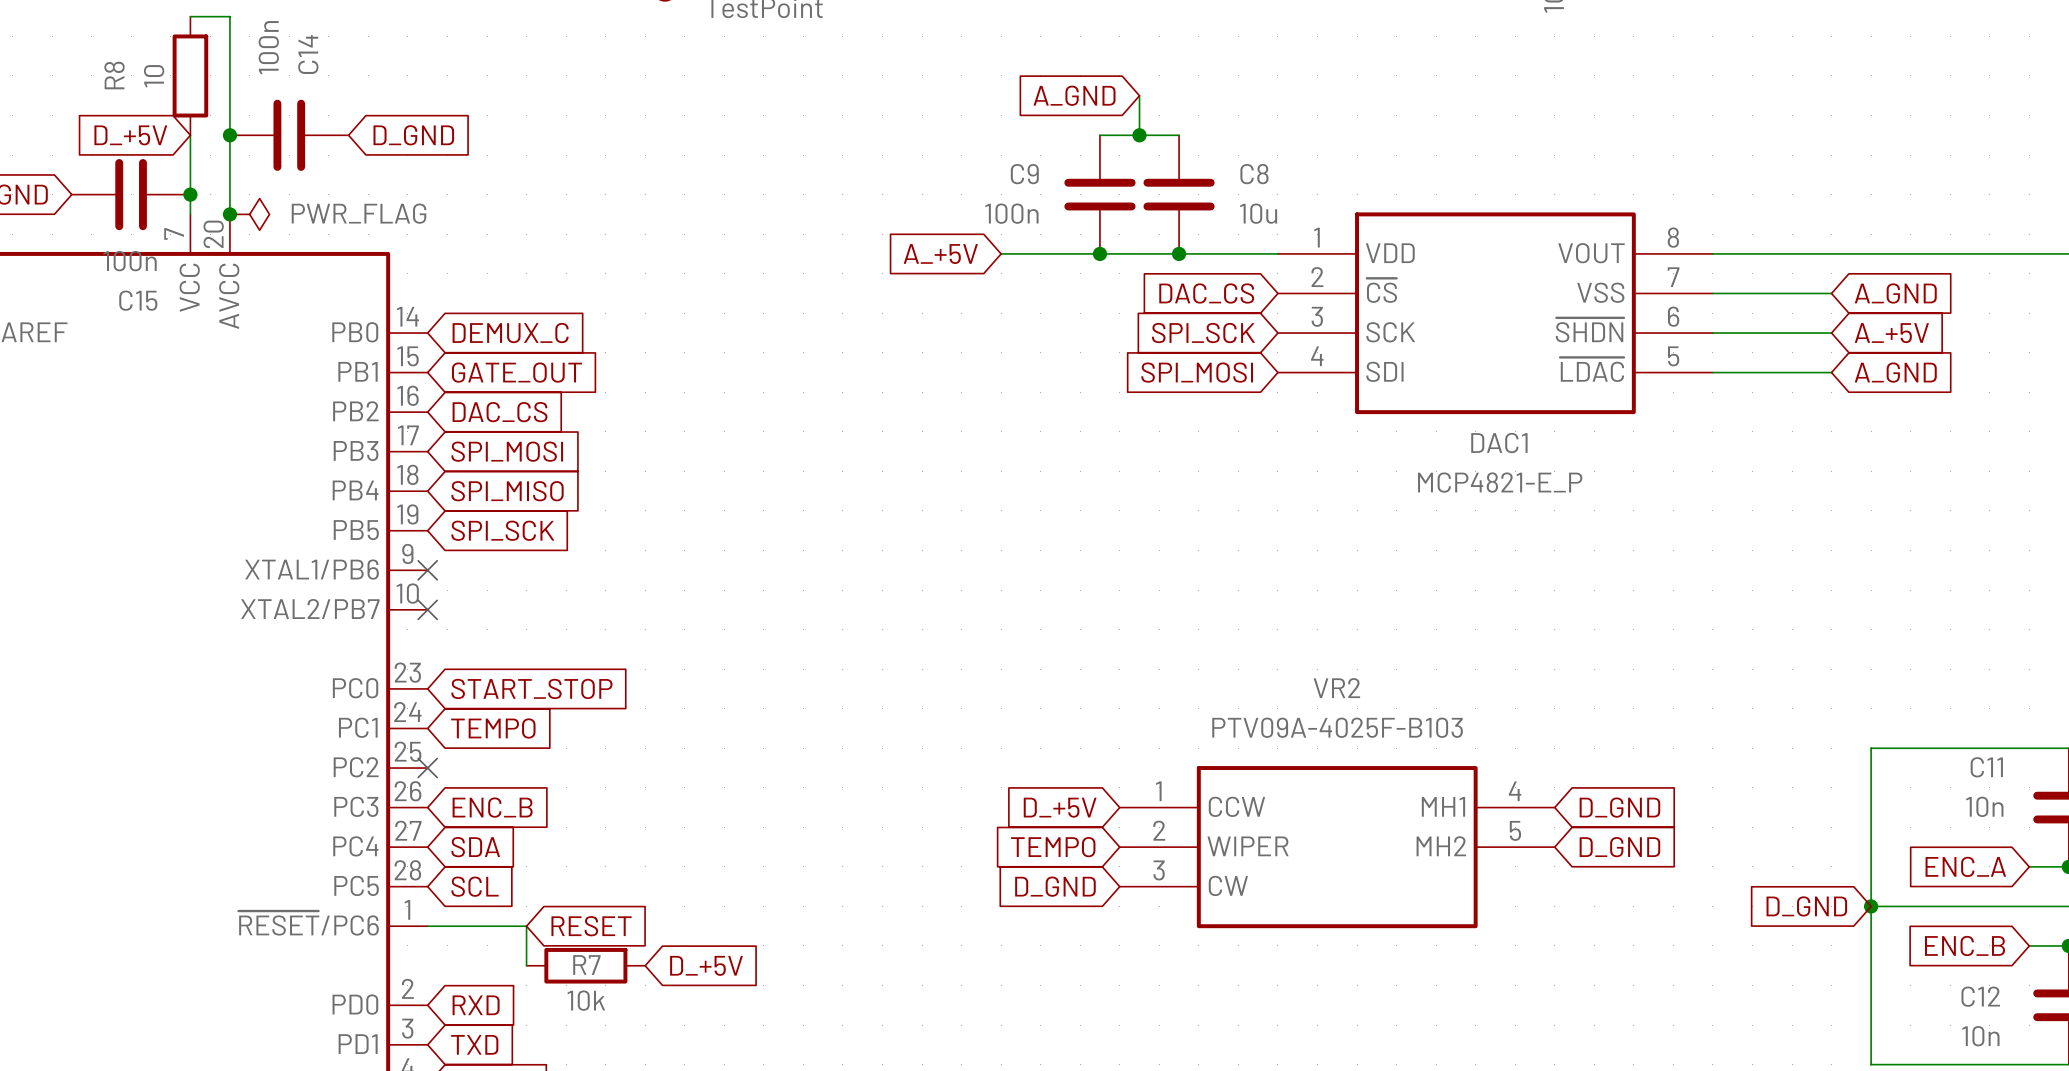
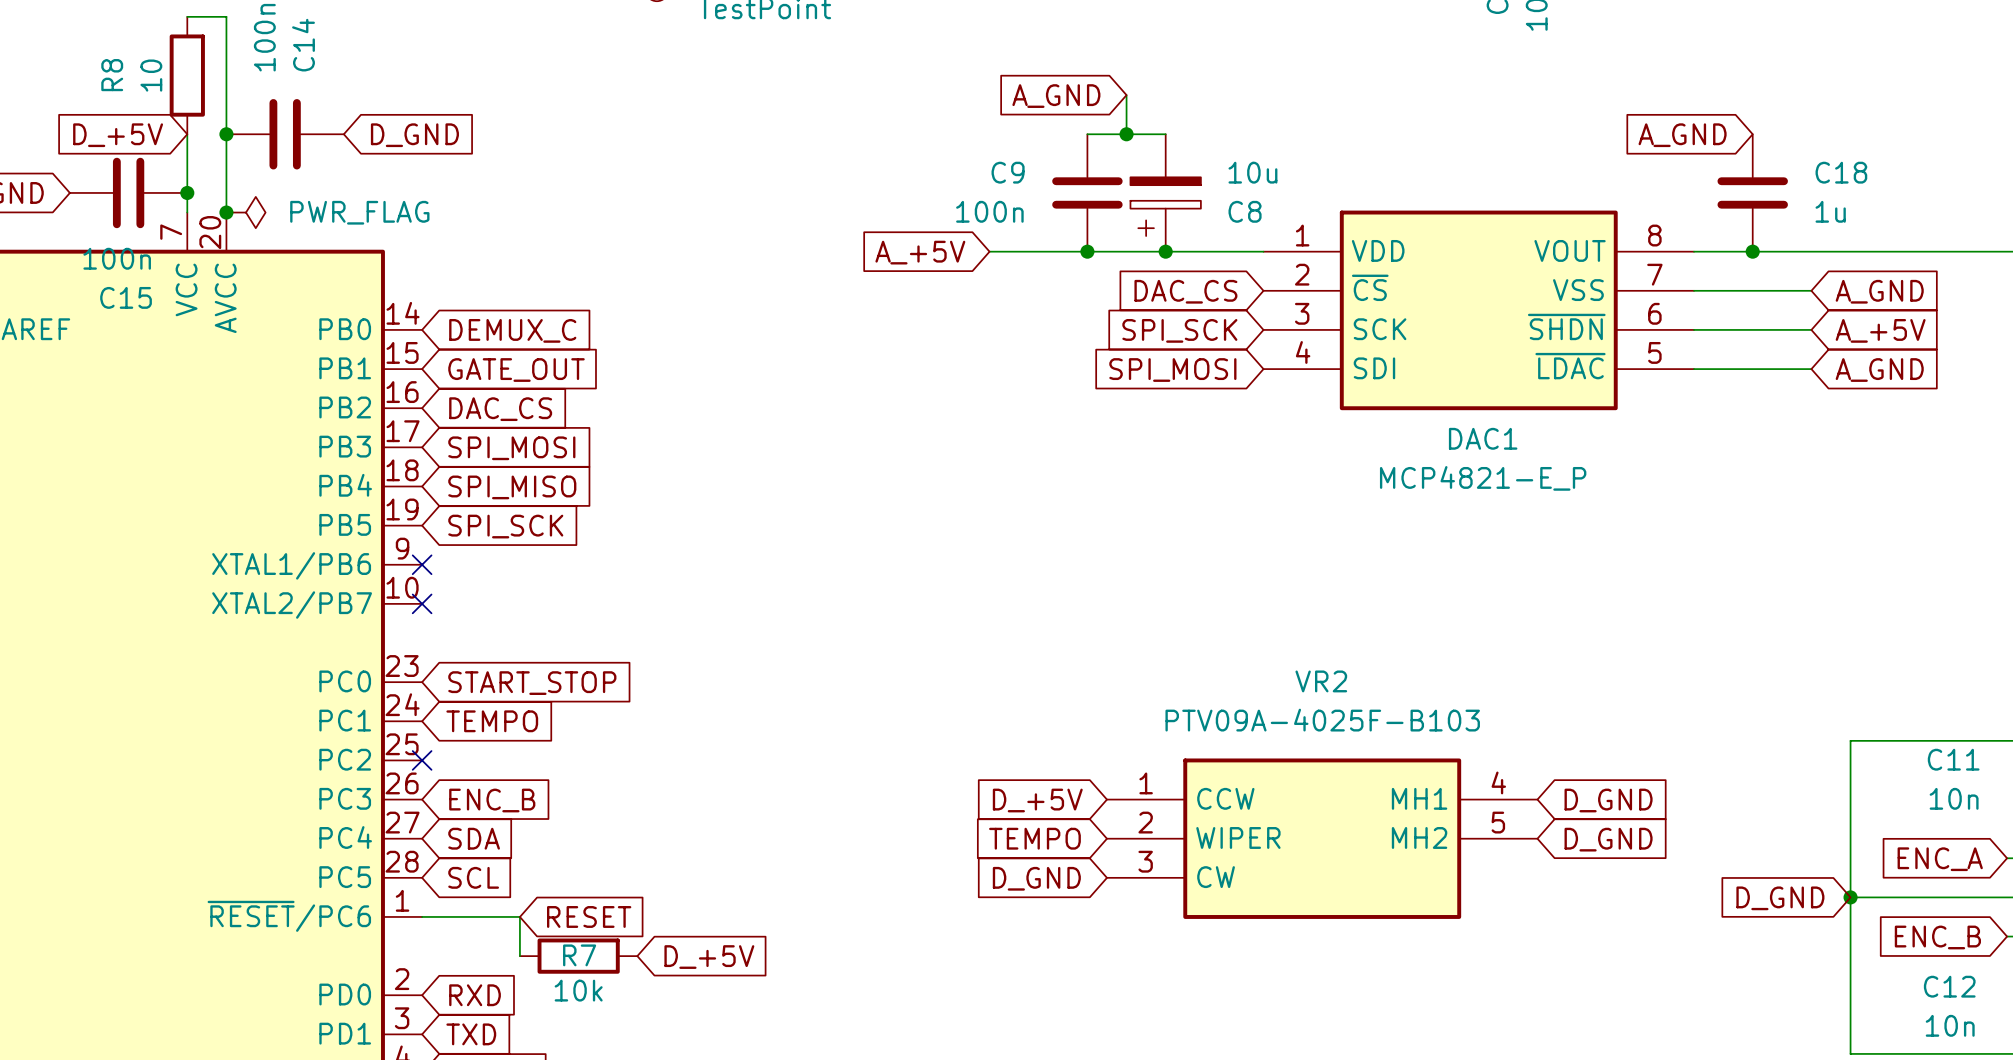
C8 symbol: [1143, 135, 1215, 254] -> [1130, 134, 1201, 252]
global label: none -> A_GND (1682, 135)
C8 name position: C8 (1254, 174) -> C8 (1245, 211)
C18: none -> 1u (1752, 192)
C8 value position: 10u (1258, 213) -> 10u (1252, 172)
junction: none -> (1752, 251)

